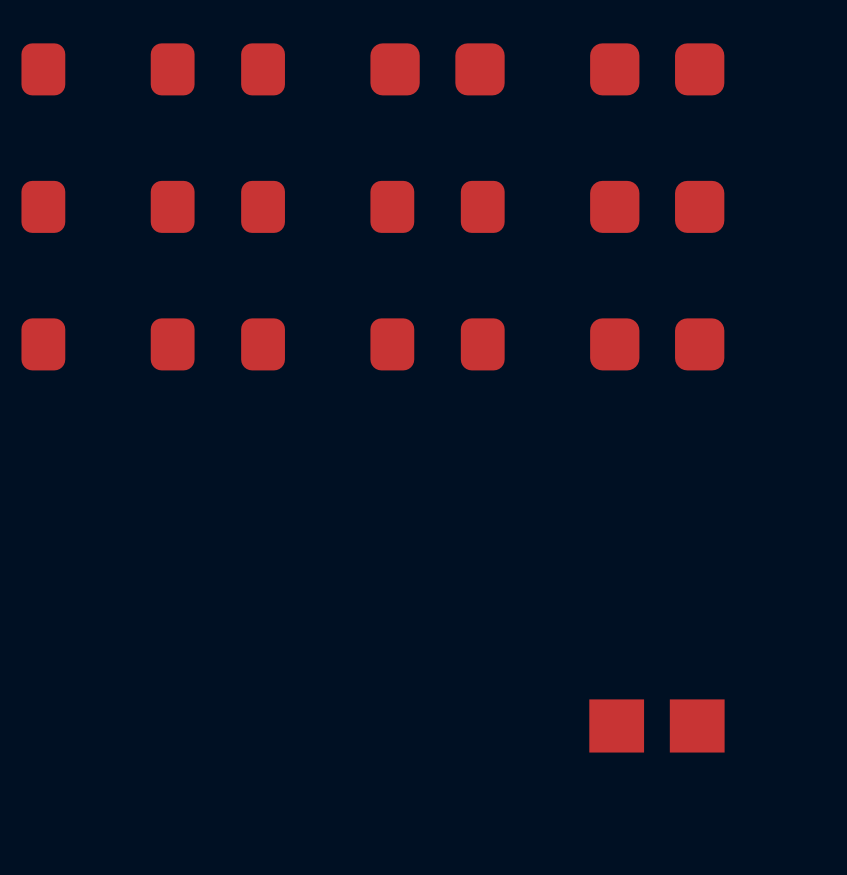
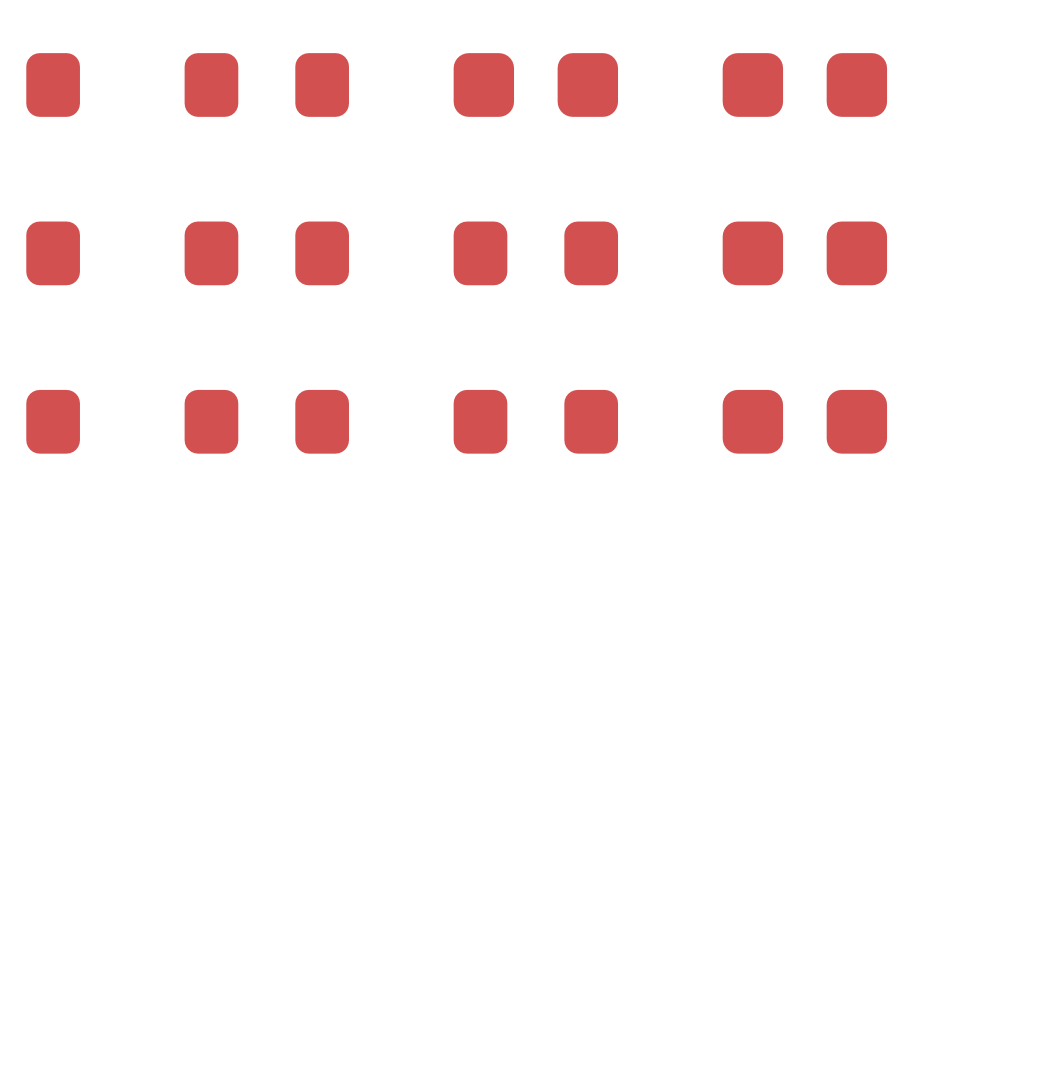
part: (656, 725) -> none

